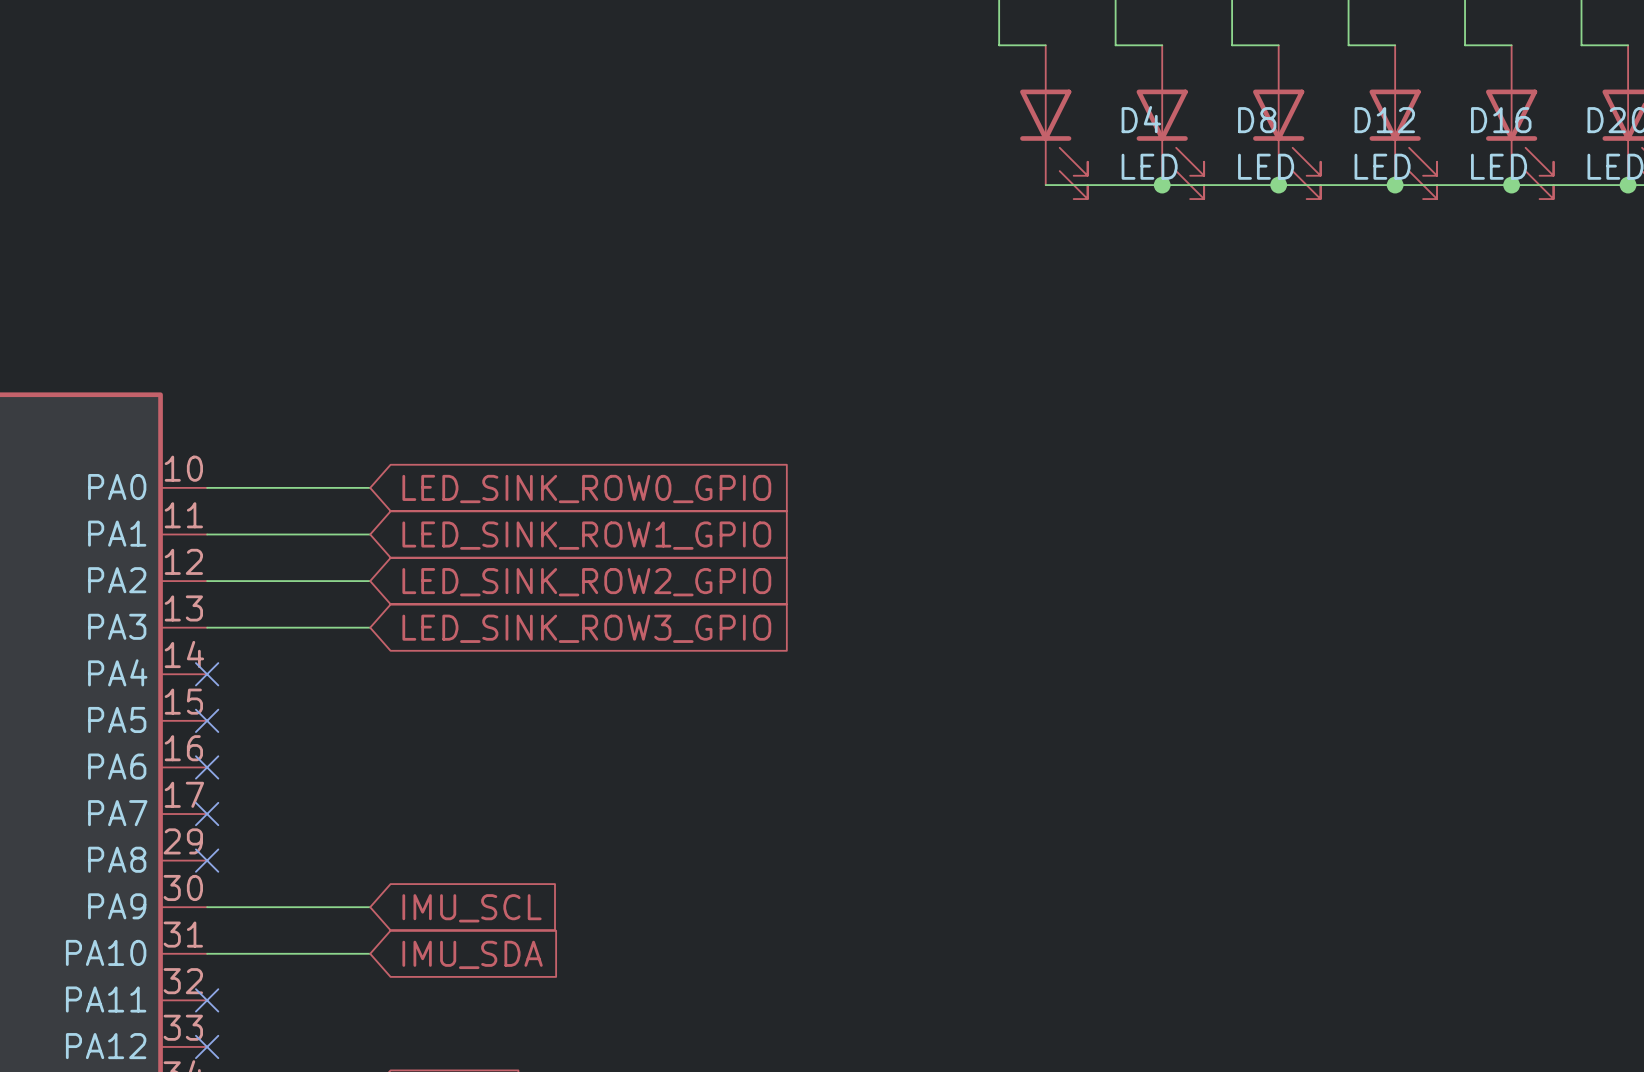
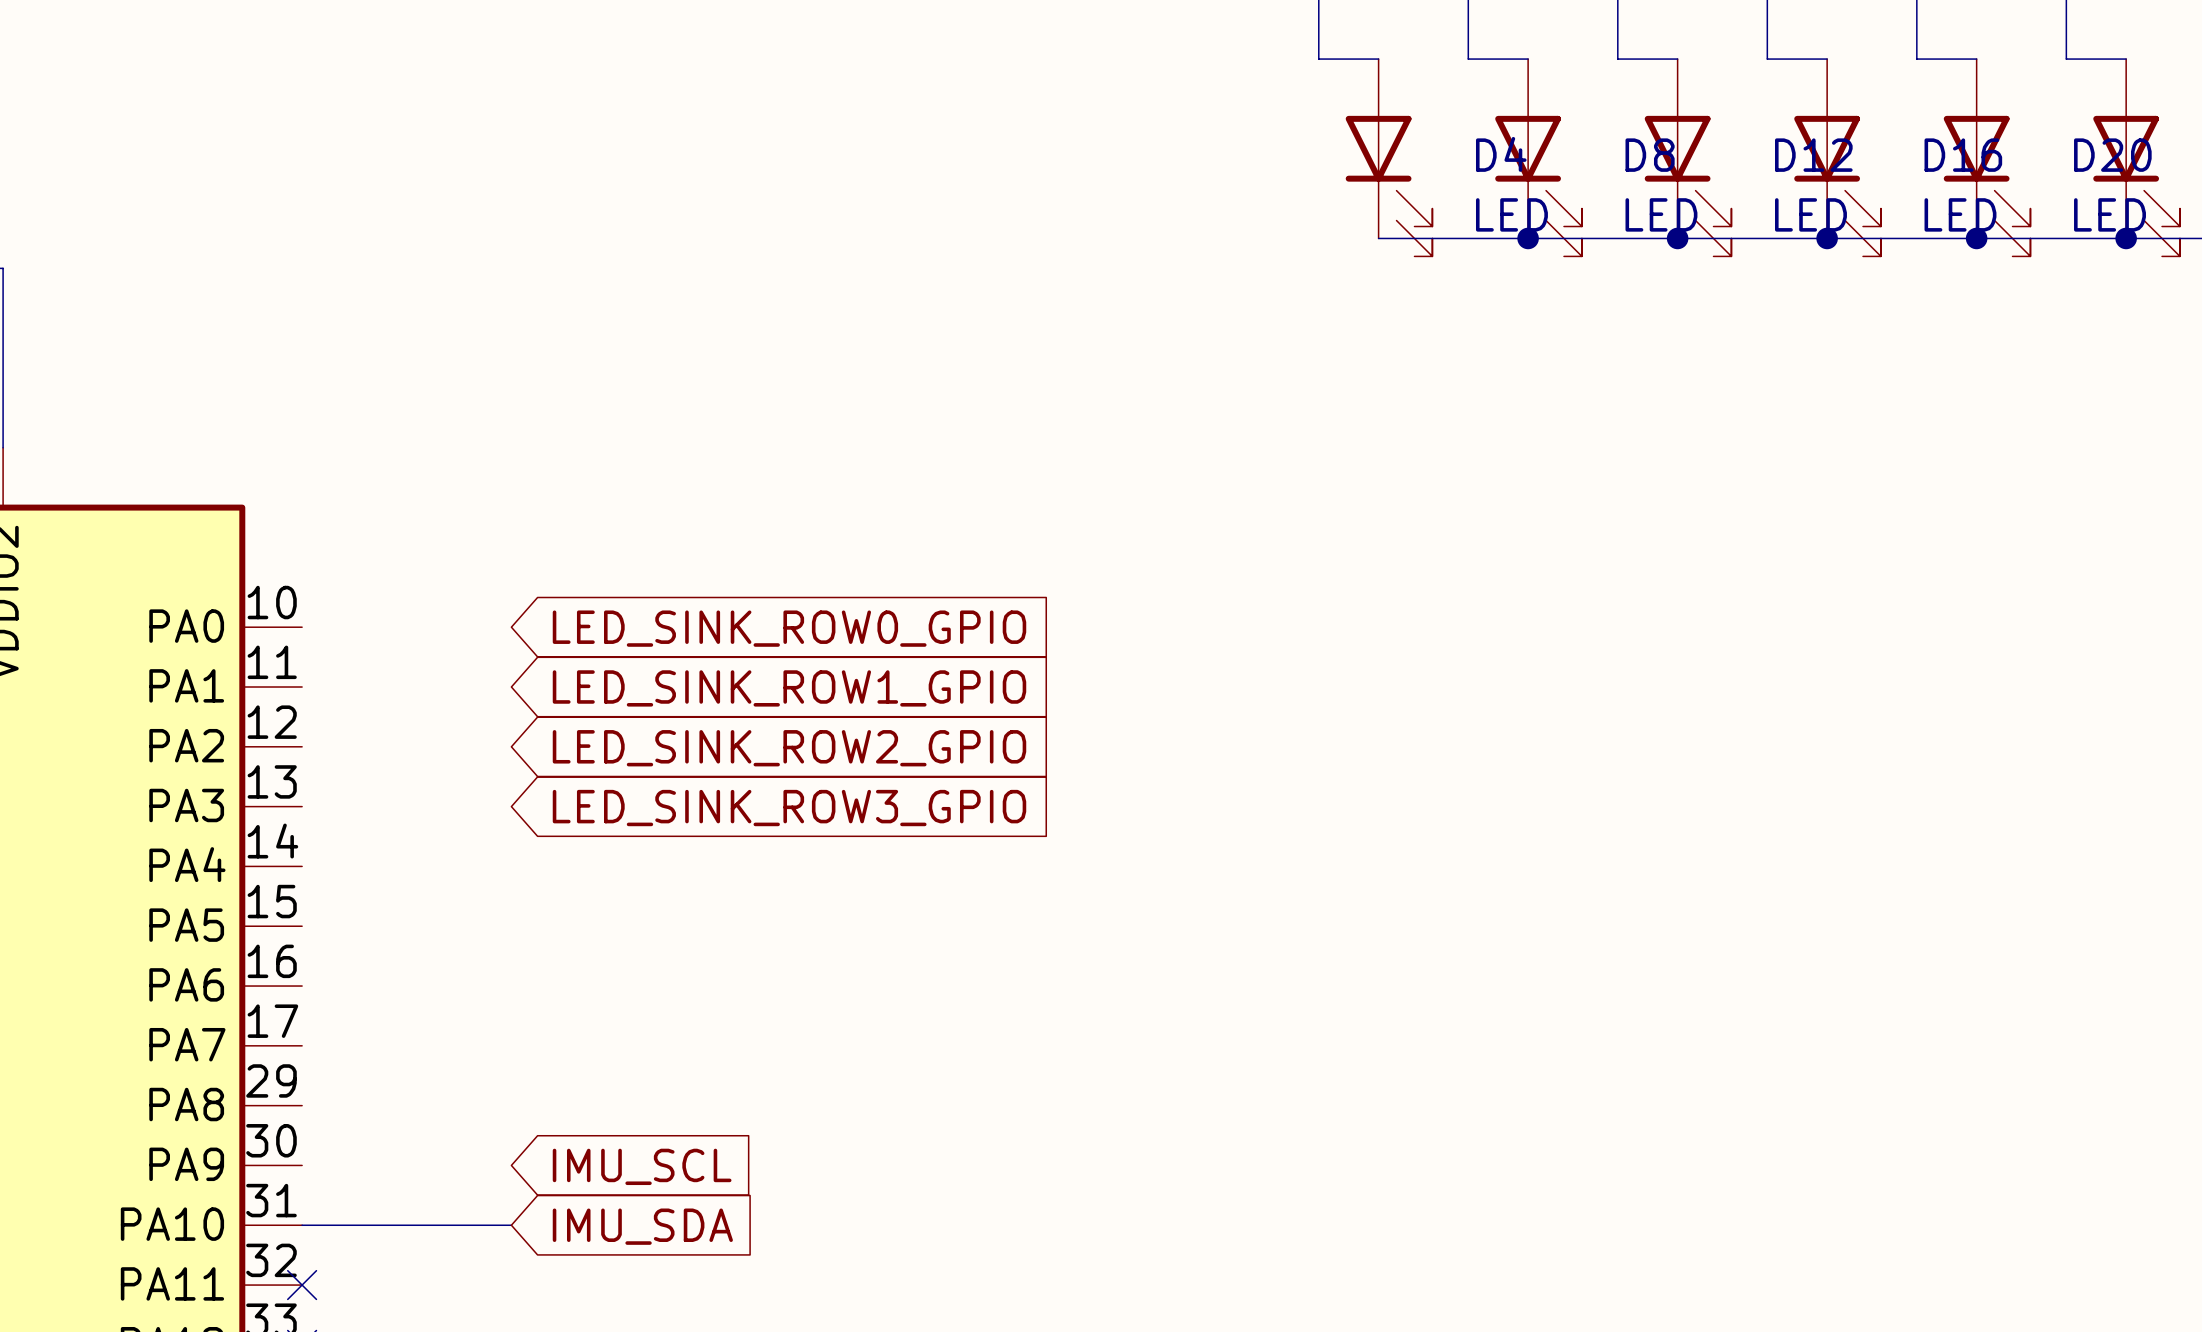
wire: (207, 487) (370, 487) -> none
wire: (207, 534) (370, 534) -> none
wire: (207, 581) (370, 581) -> none
wire: (207, 627) (370, 627) -> none
no-connect mark: (207, 674) -> none
no-connect mark: (207, 720) -> none
no-connect mark: (207, 767) -> none
no-connect mark: (207, 814) -> none
no-connect mark: (207, 860) -> none
wire: (207, 907) (370, 907) -> none

